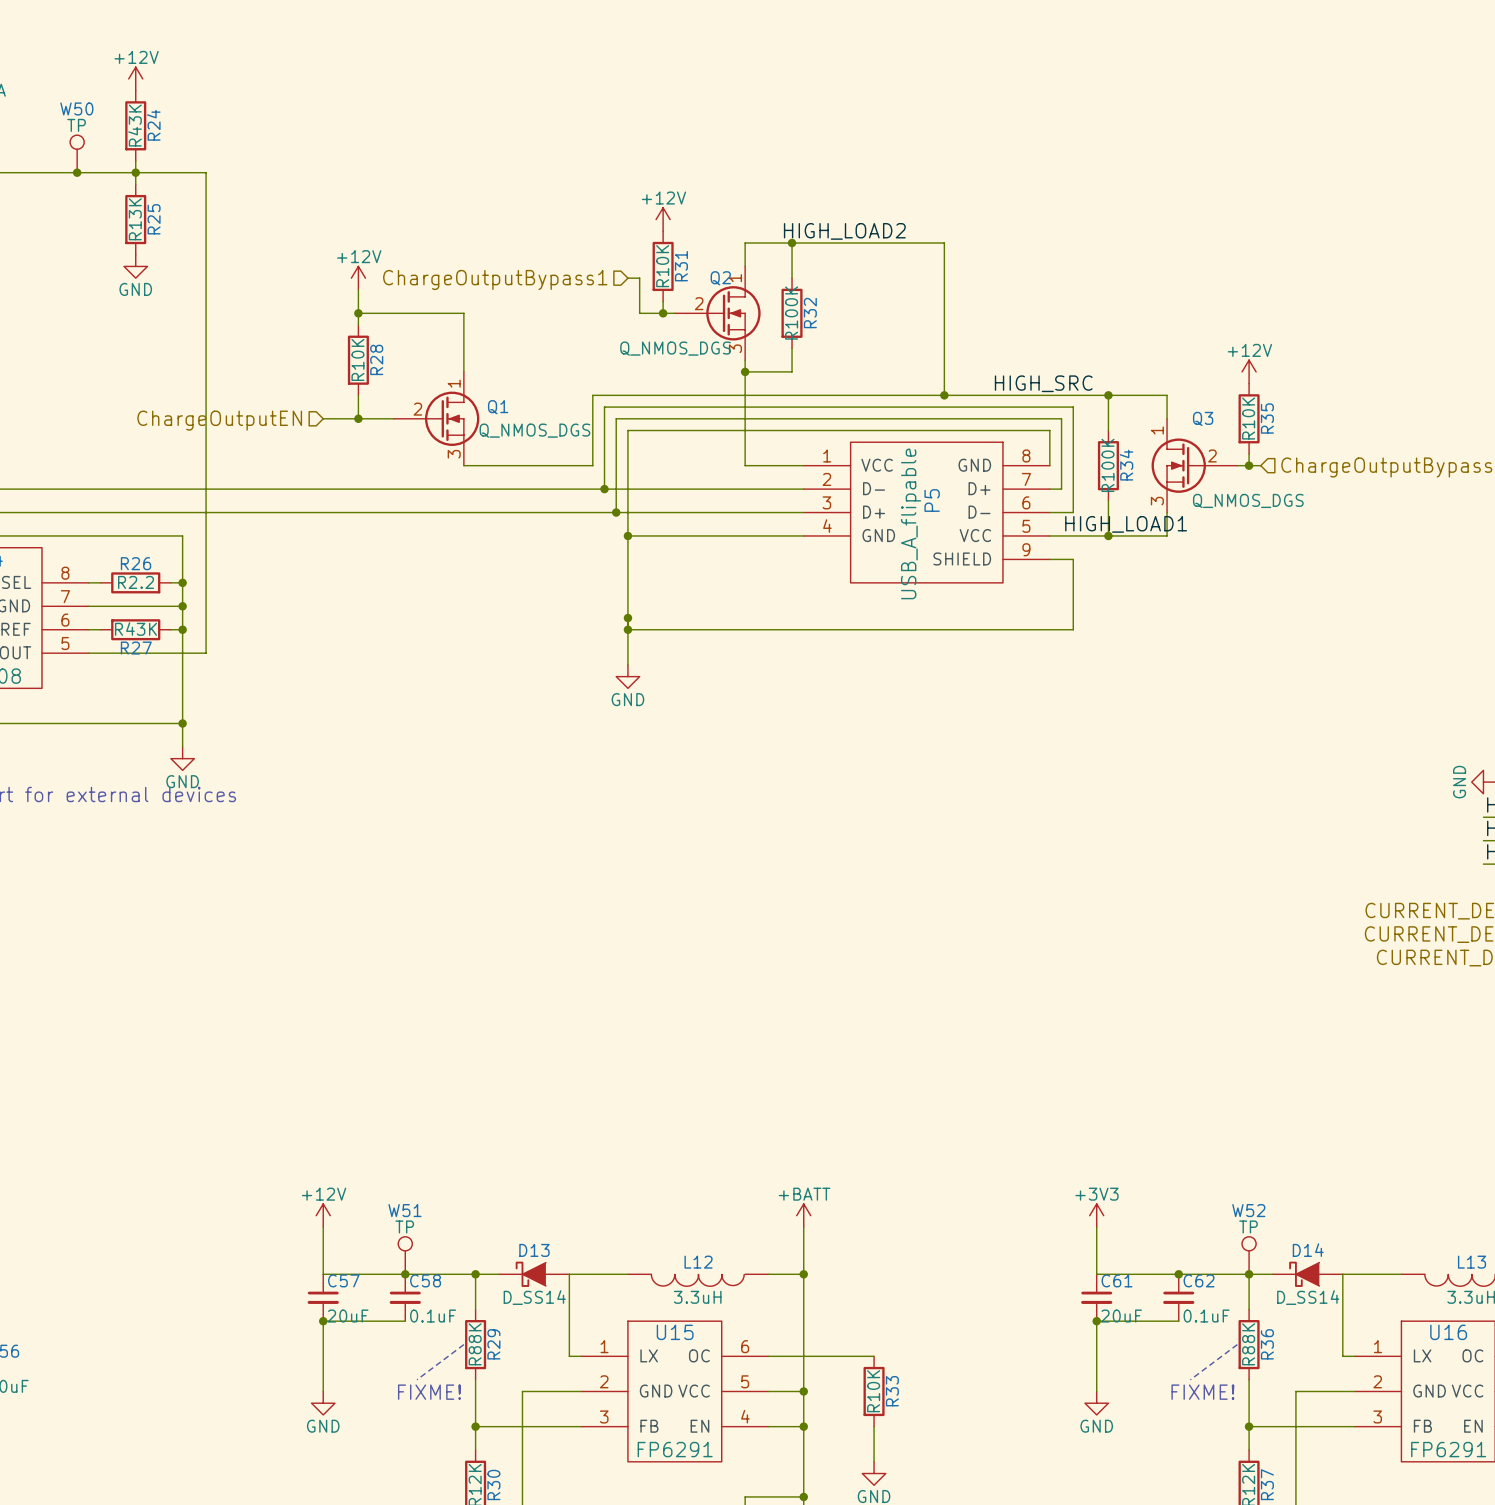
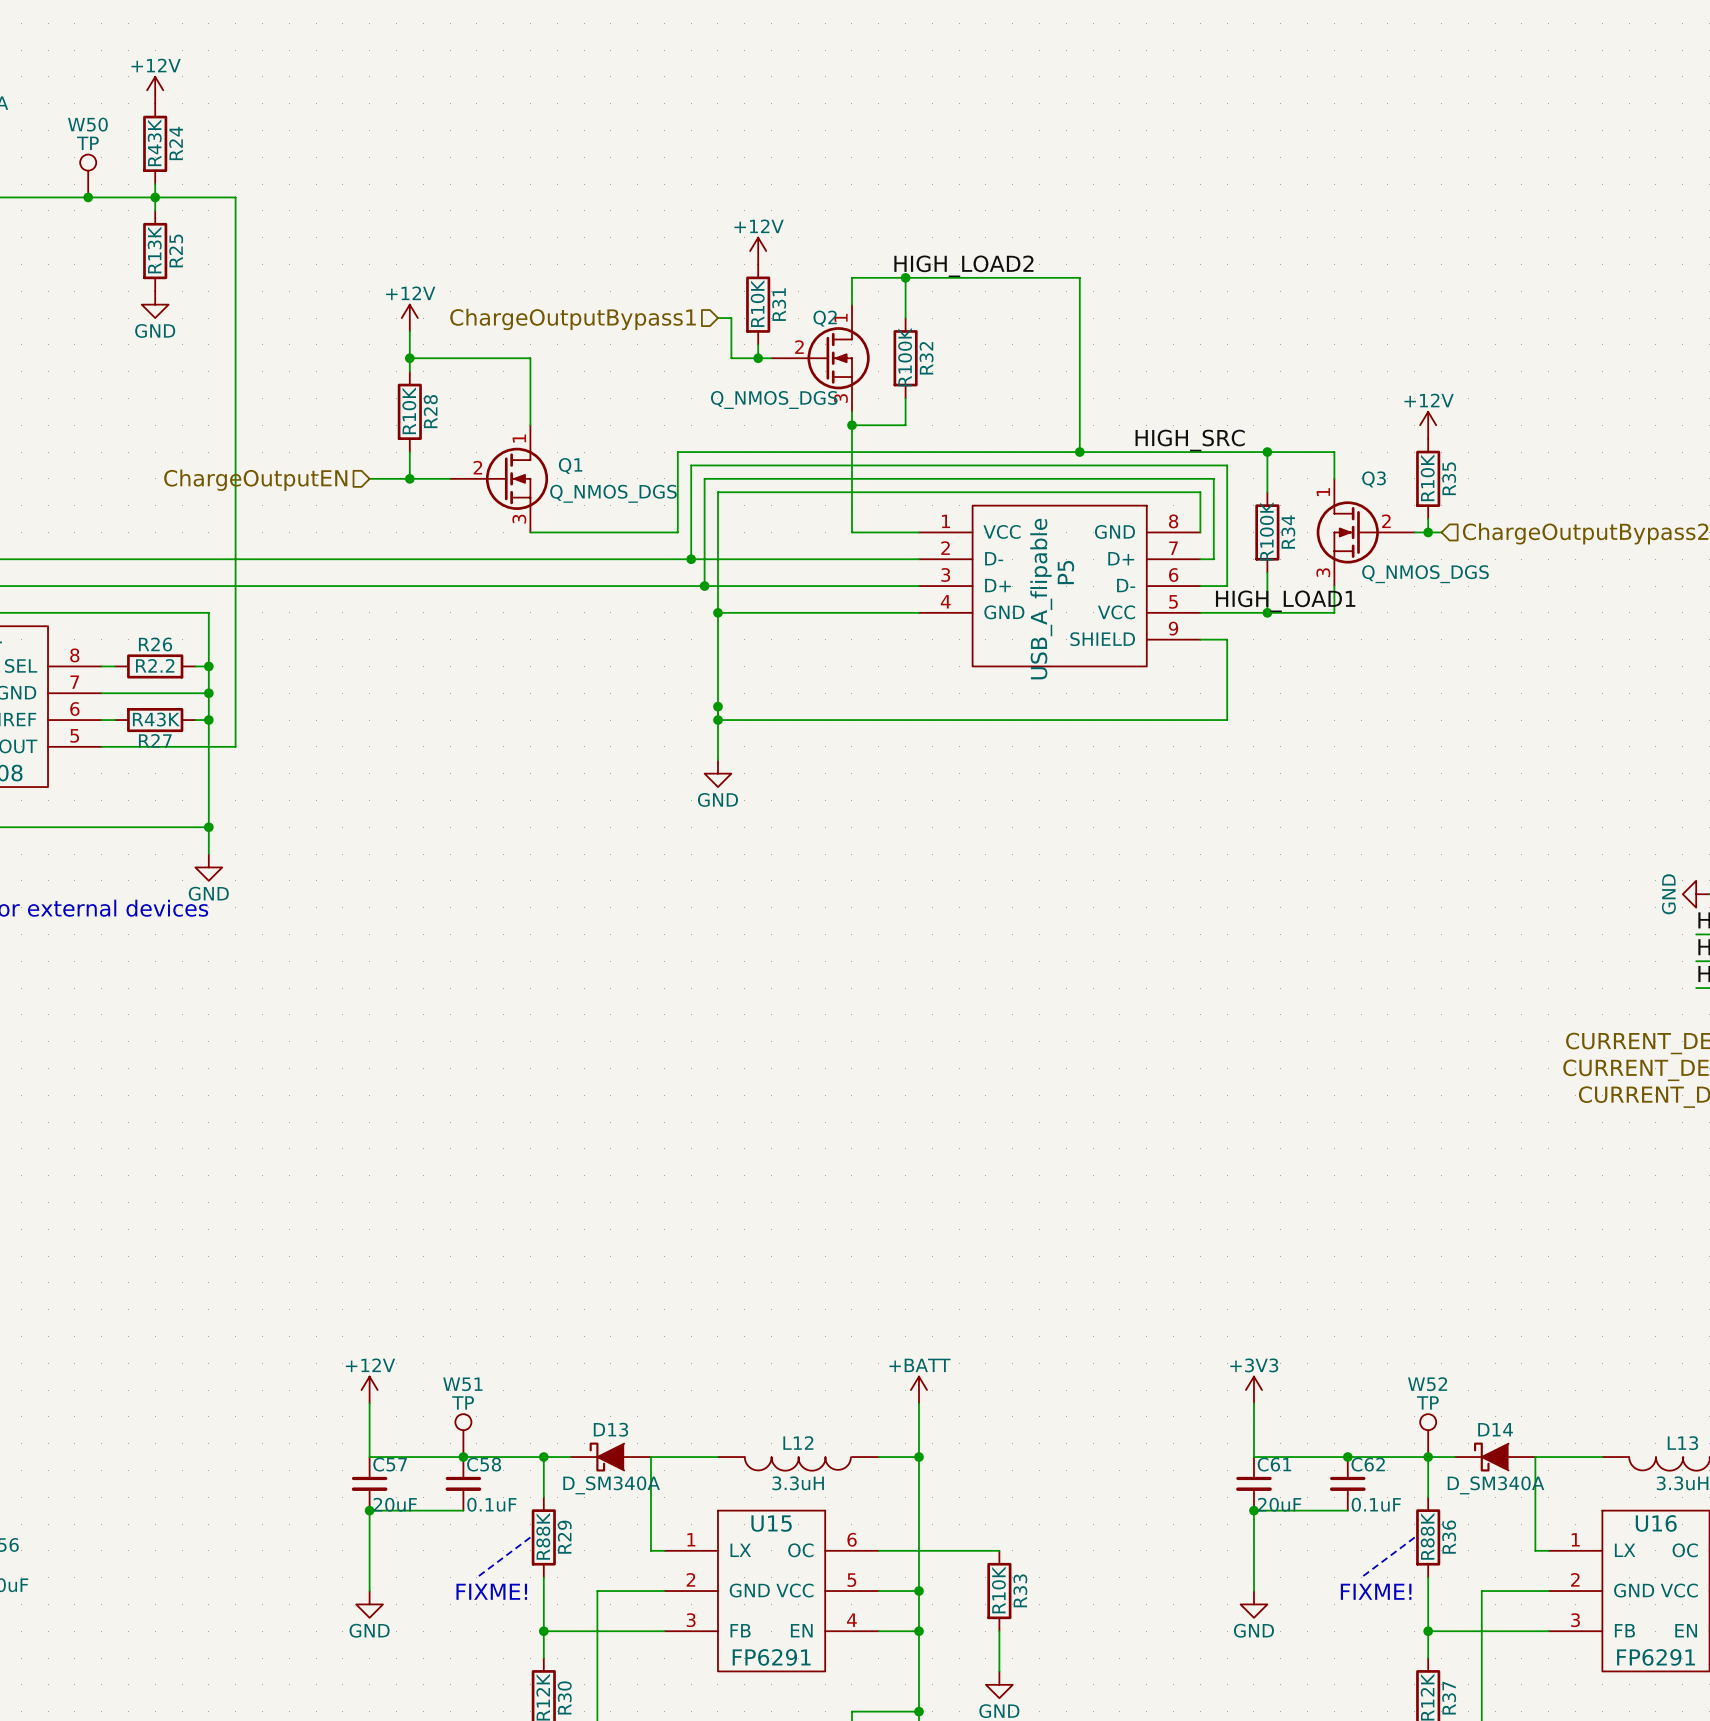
D13 value: D_SS14 (534, 1297) -> D_SM340A (611, 1485)
D14 value: D_SS14 (1308, 1297) -> D_SM340A (1496, 1485)

